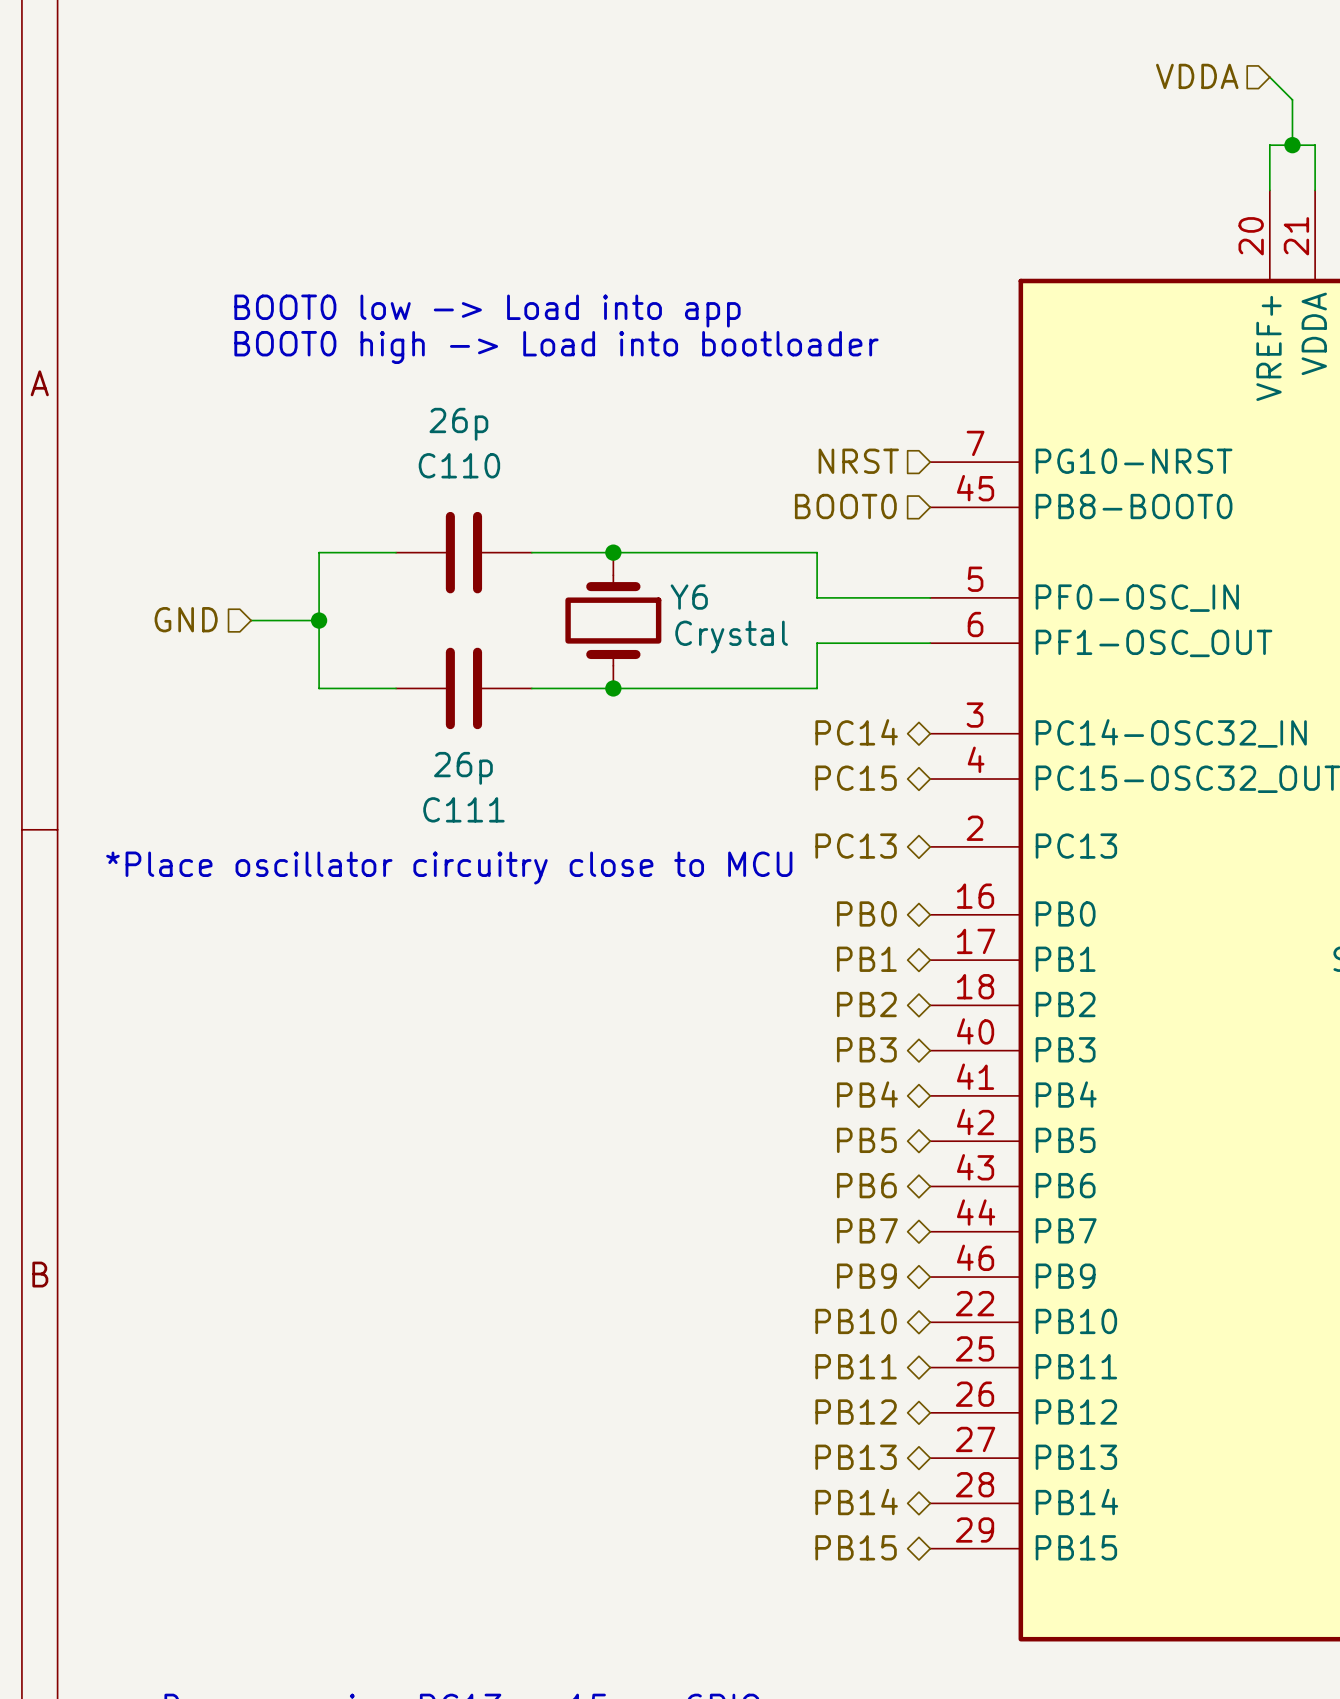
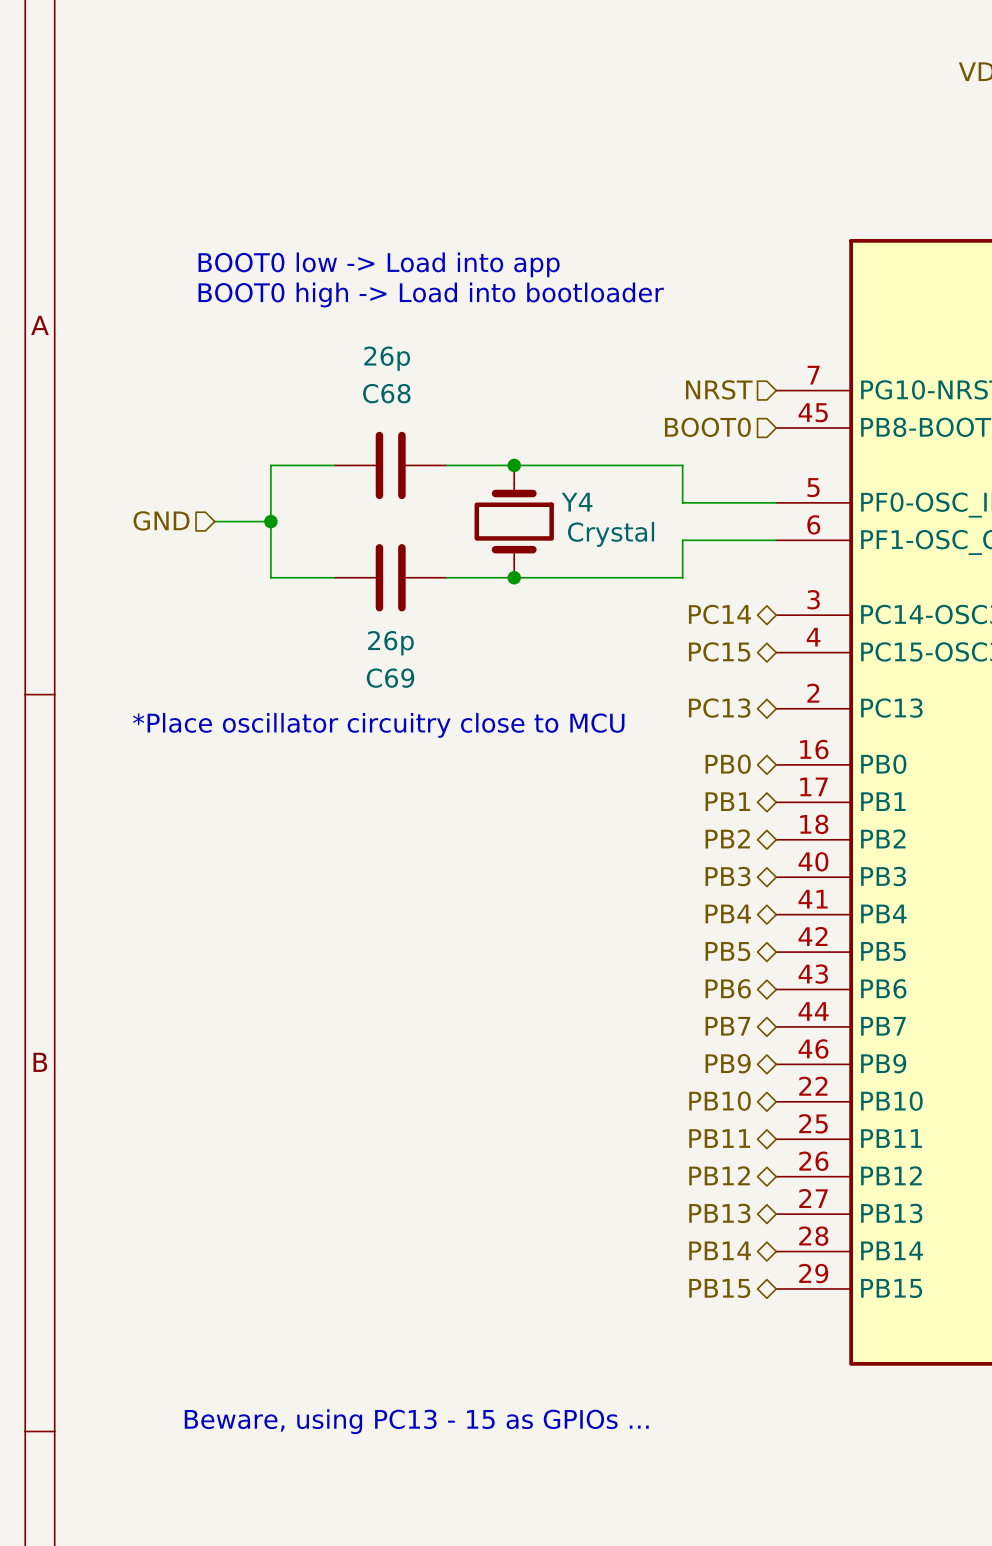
C110 name: C110 (459, 465) -> C68 (386, 393)
Y6 name: Y6 (689, 597) -> Y4 (577, 502)
C111 name: C111 (463, 809) -> C69 (390, 678)

